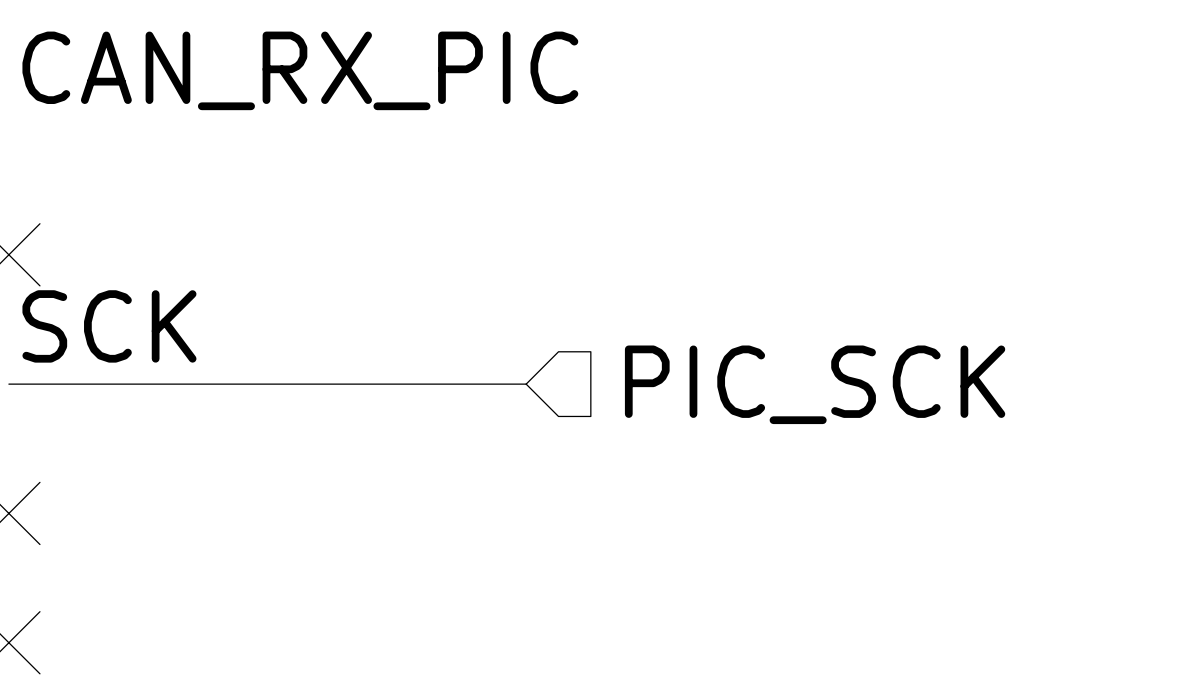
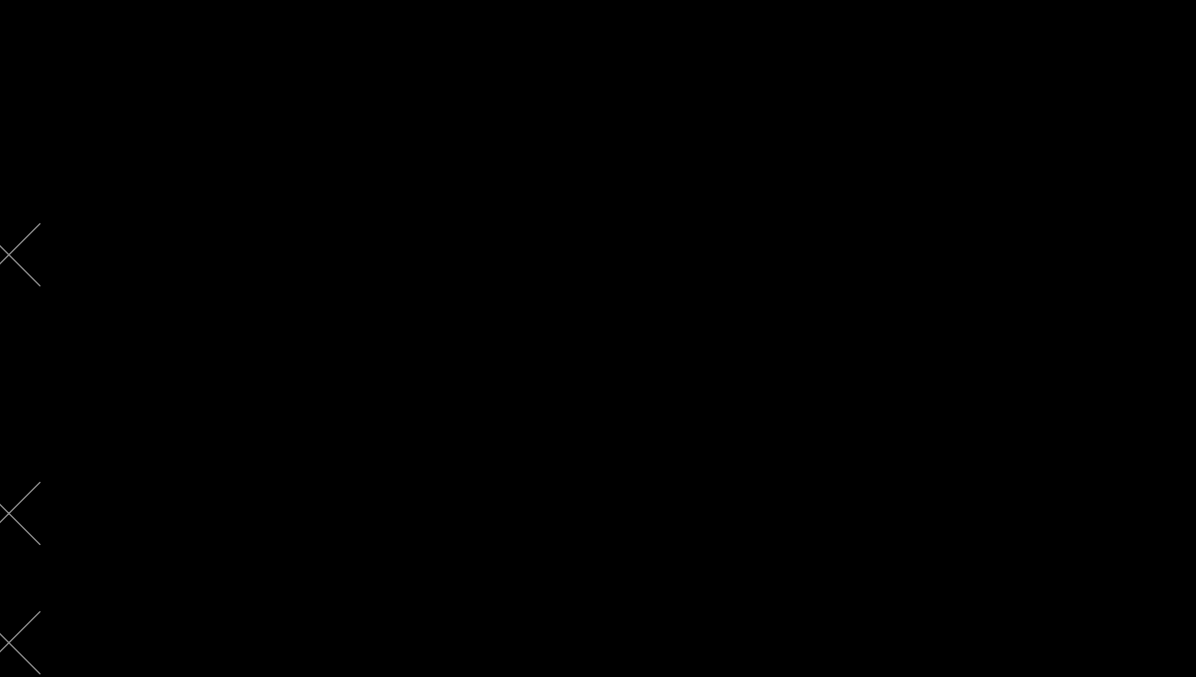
label: CAN_RX_PIC (300, 70) -> none
label: SCK (109, 326) -> none
wire: (8, 384) (526, 384) -> none
hierarchical label: PIC_SCK (815, 384) -> none

